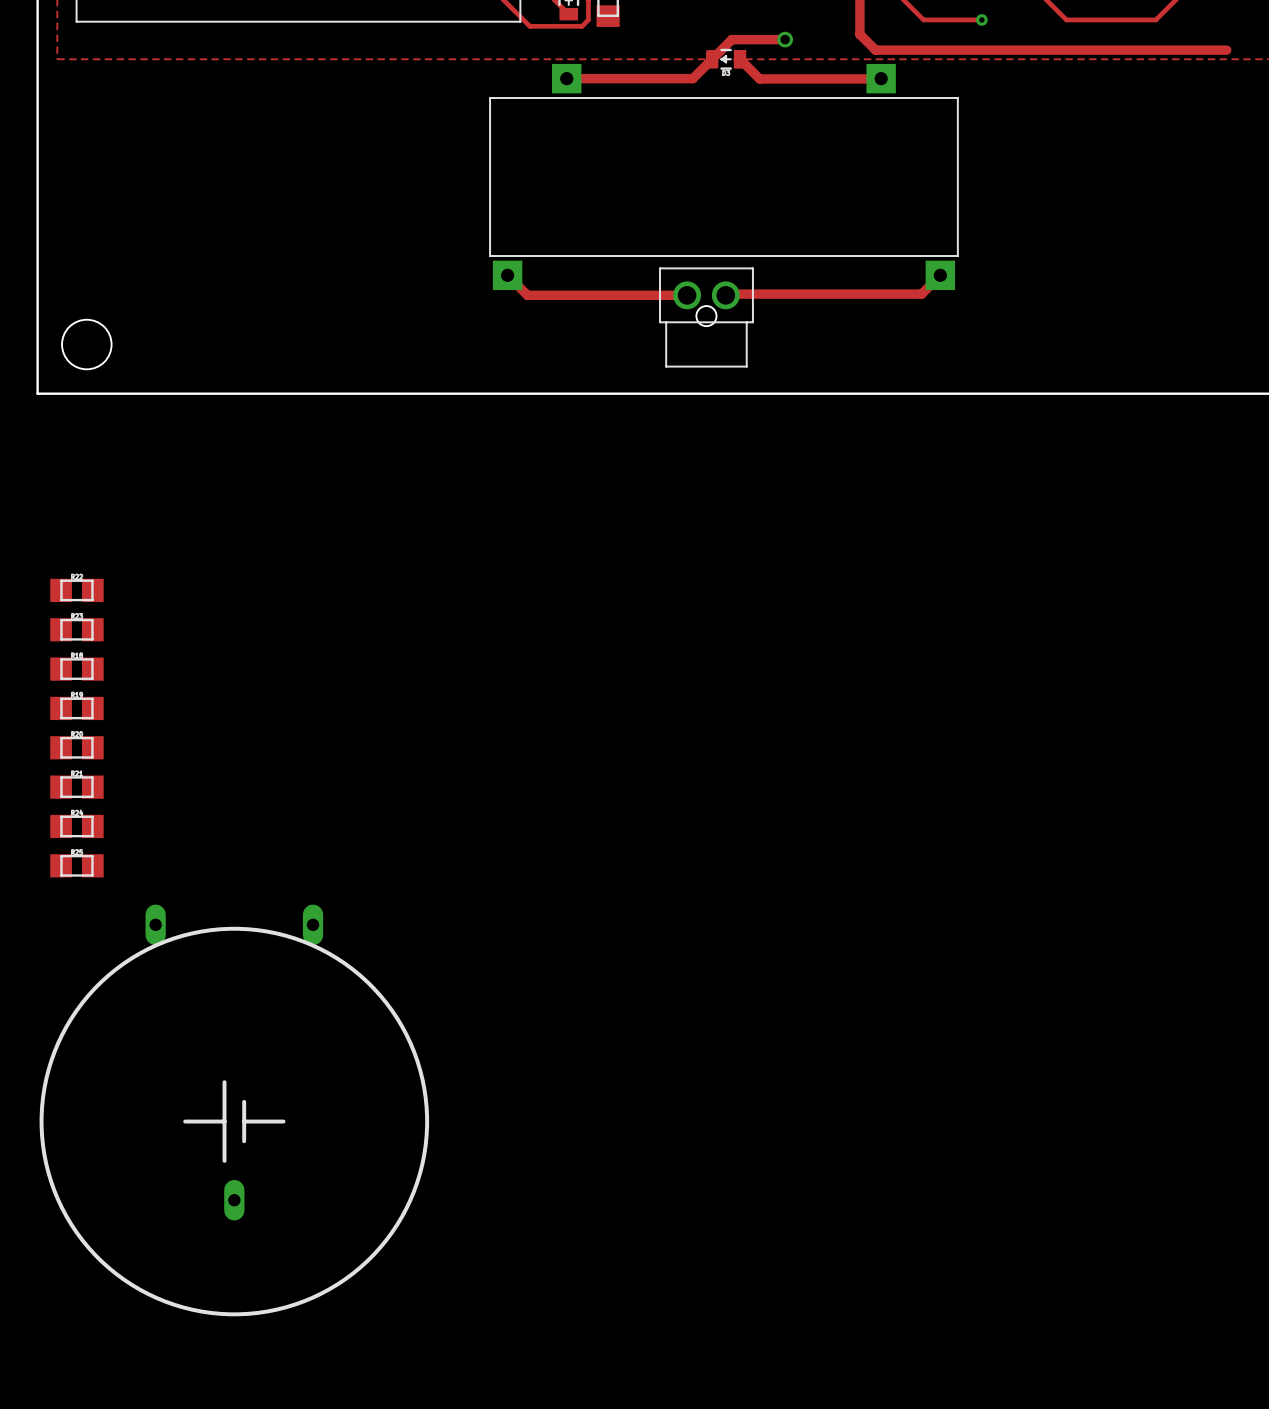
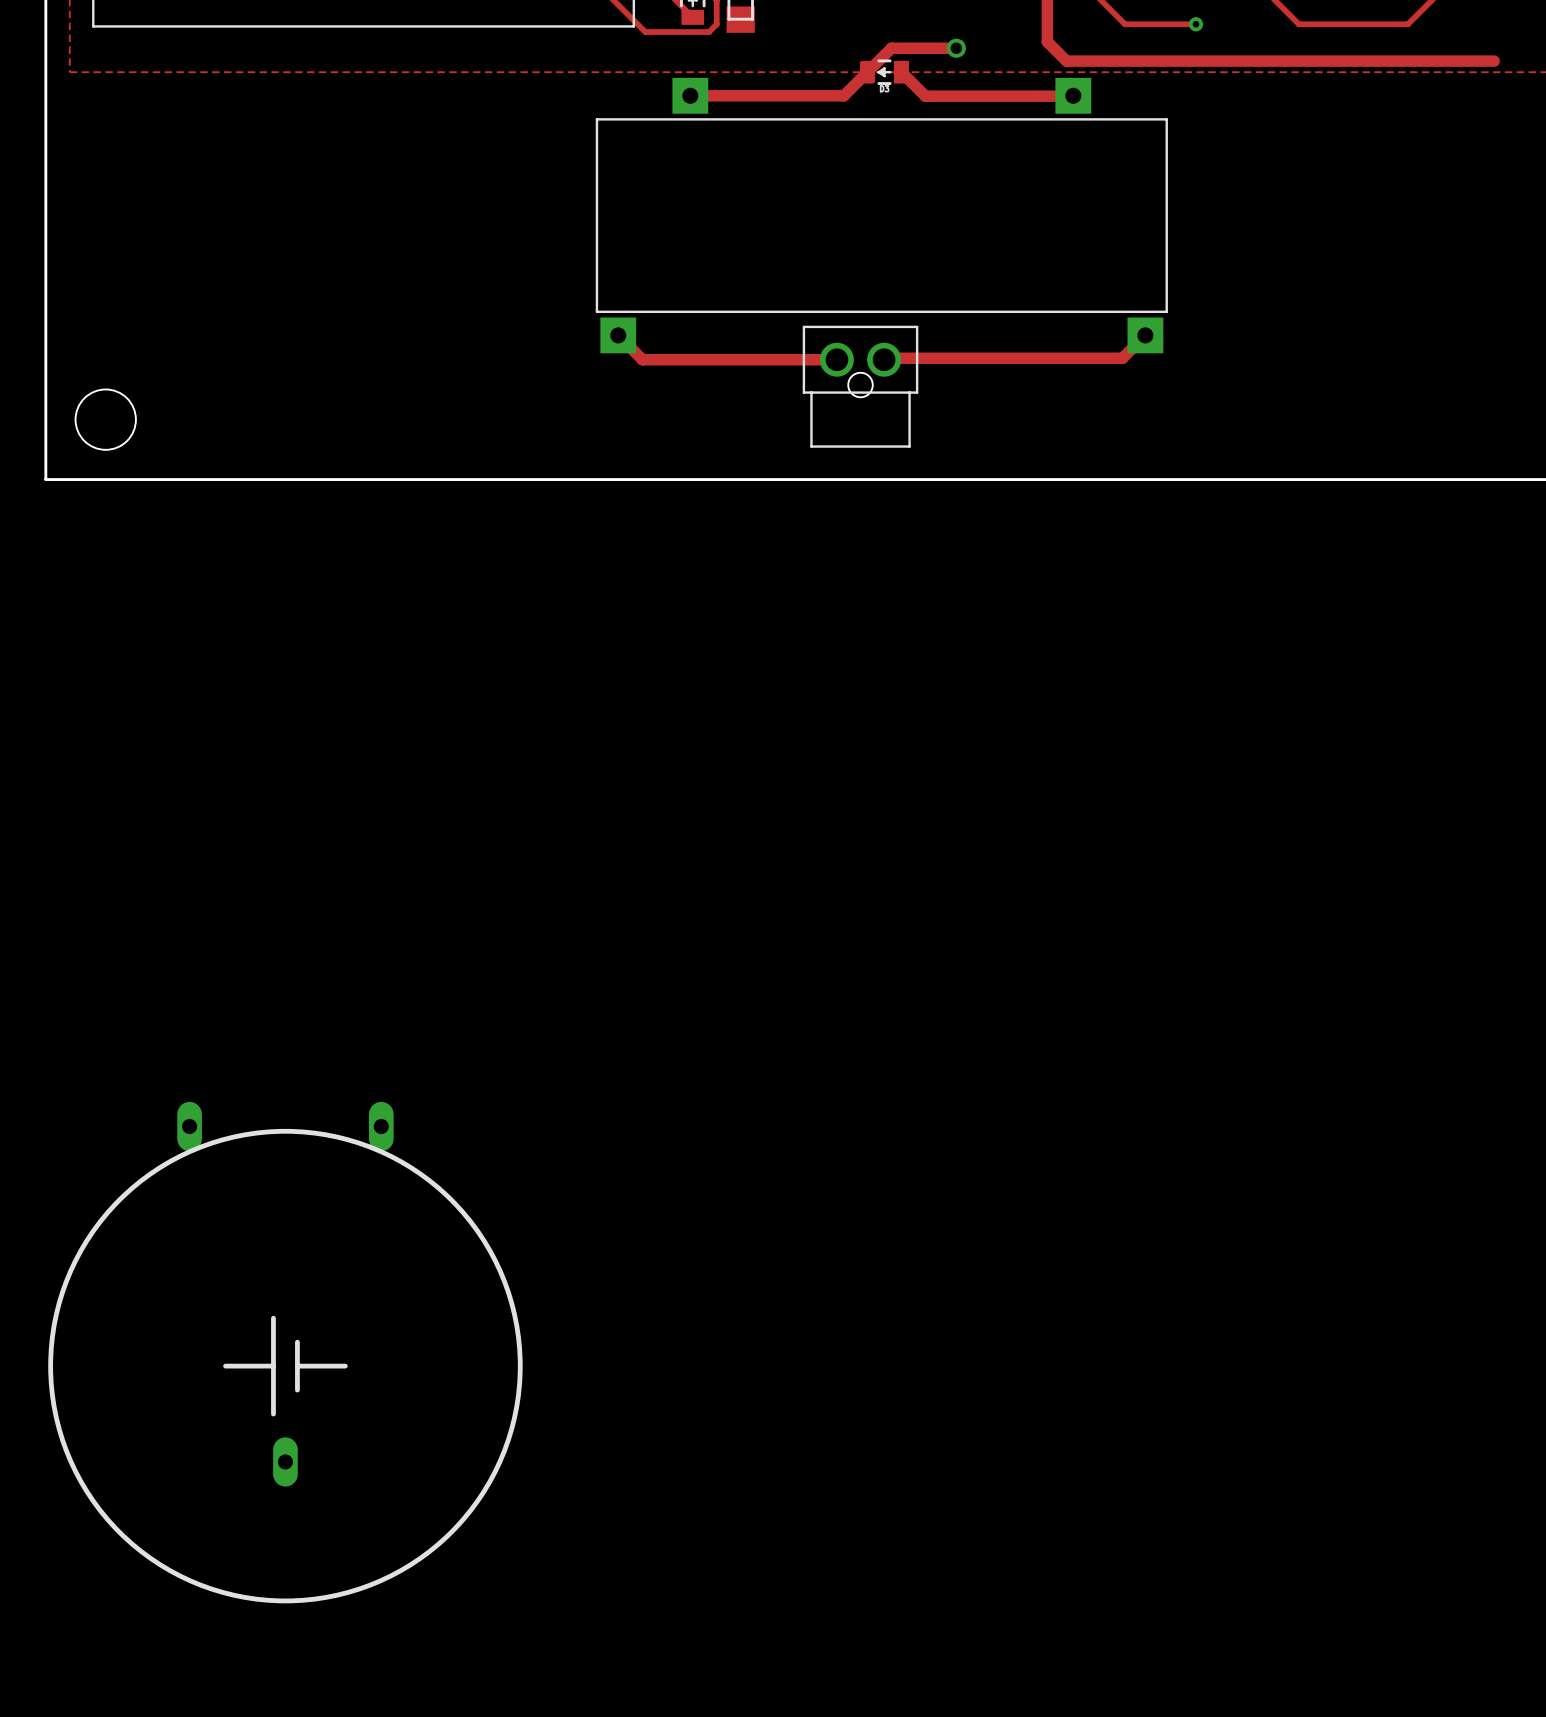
part: (76, 590) -> none
part: (76, 629) -> none
part: (76, 669) -> none
part: (76, 708) -> none
part: (76, 747) -> none
part: (76, 787) -> none
part: (76, 826) -> none
part: (76, 865) -> none

